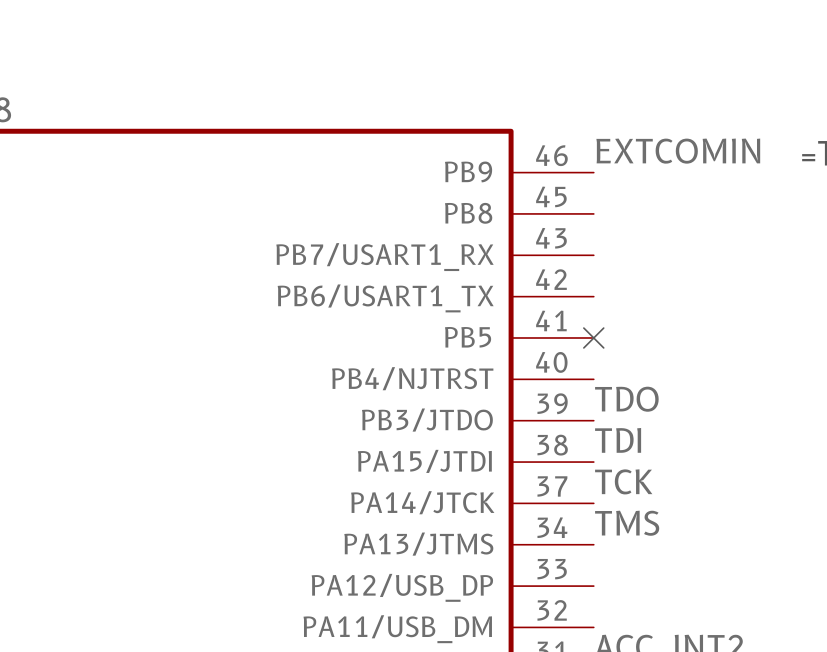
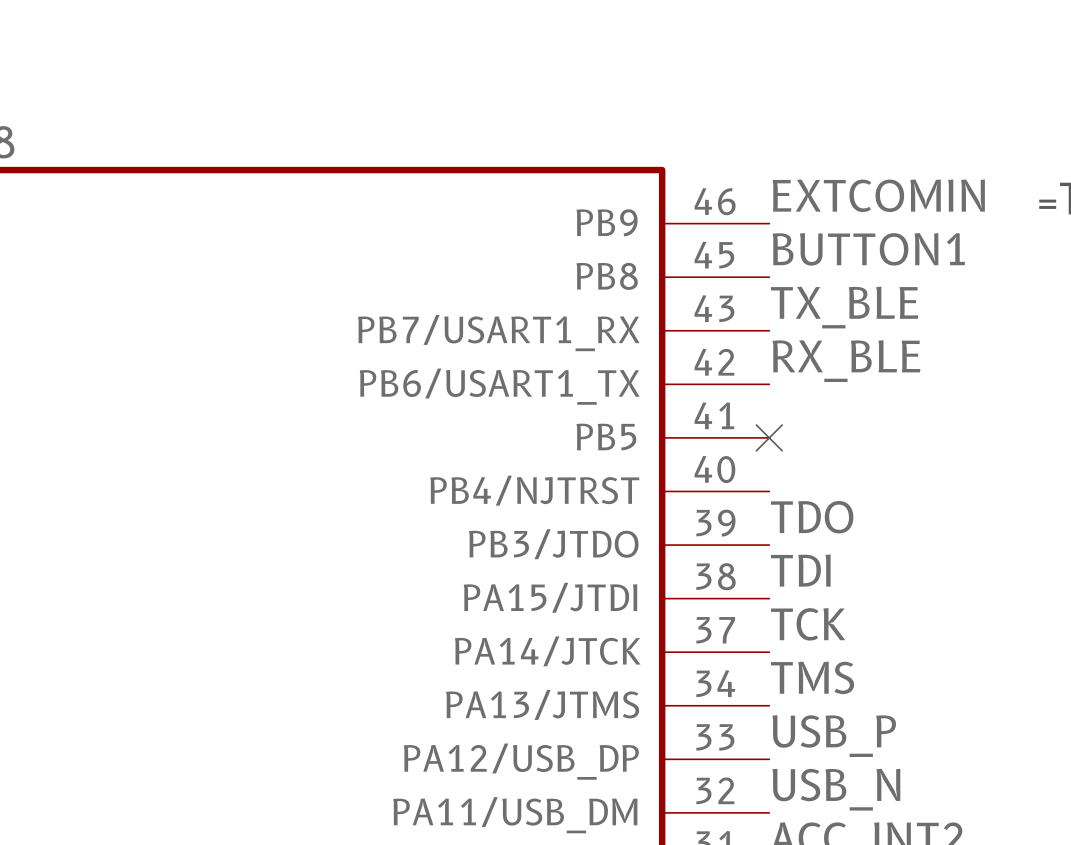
label: none -> BUTTON1 (868, 249)
label: none -> TX_BLE (844, 307)
label: none -> RX_BLE (846, 361)
label: none -> USB_P (834, 736)
label: none -> USB_N (836, 789)

